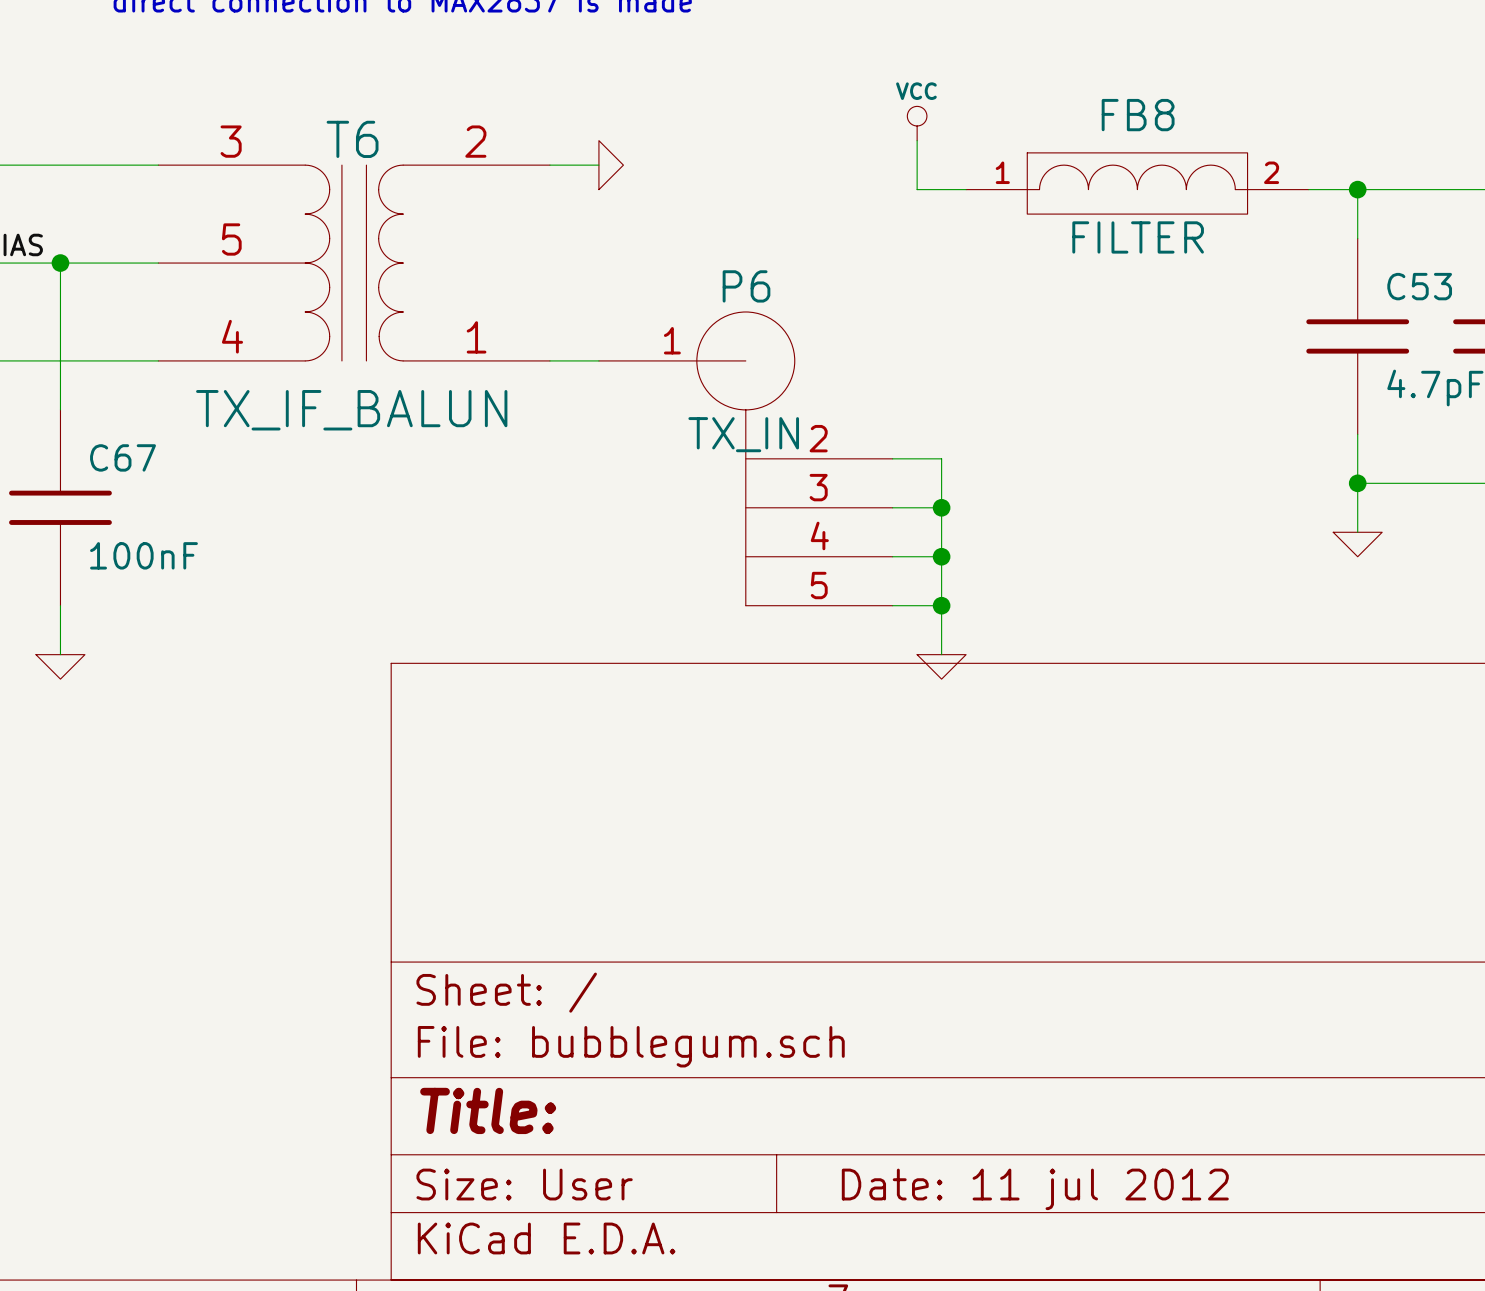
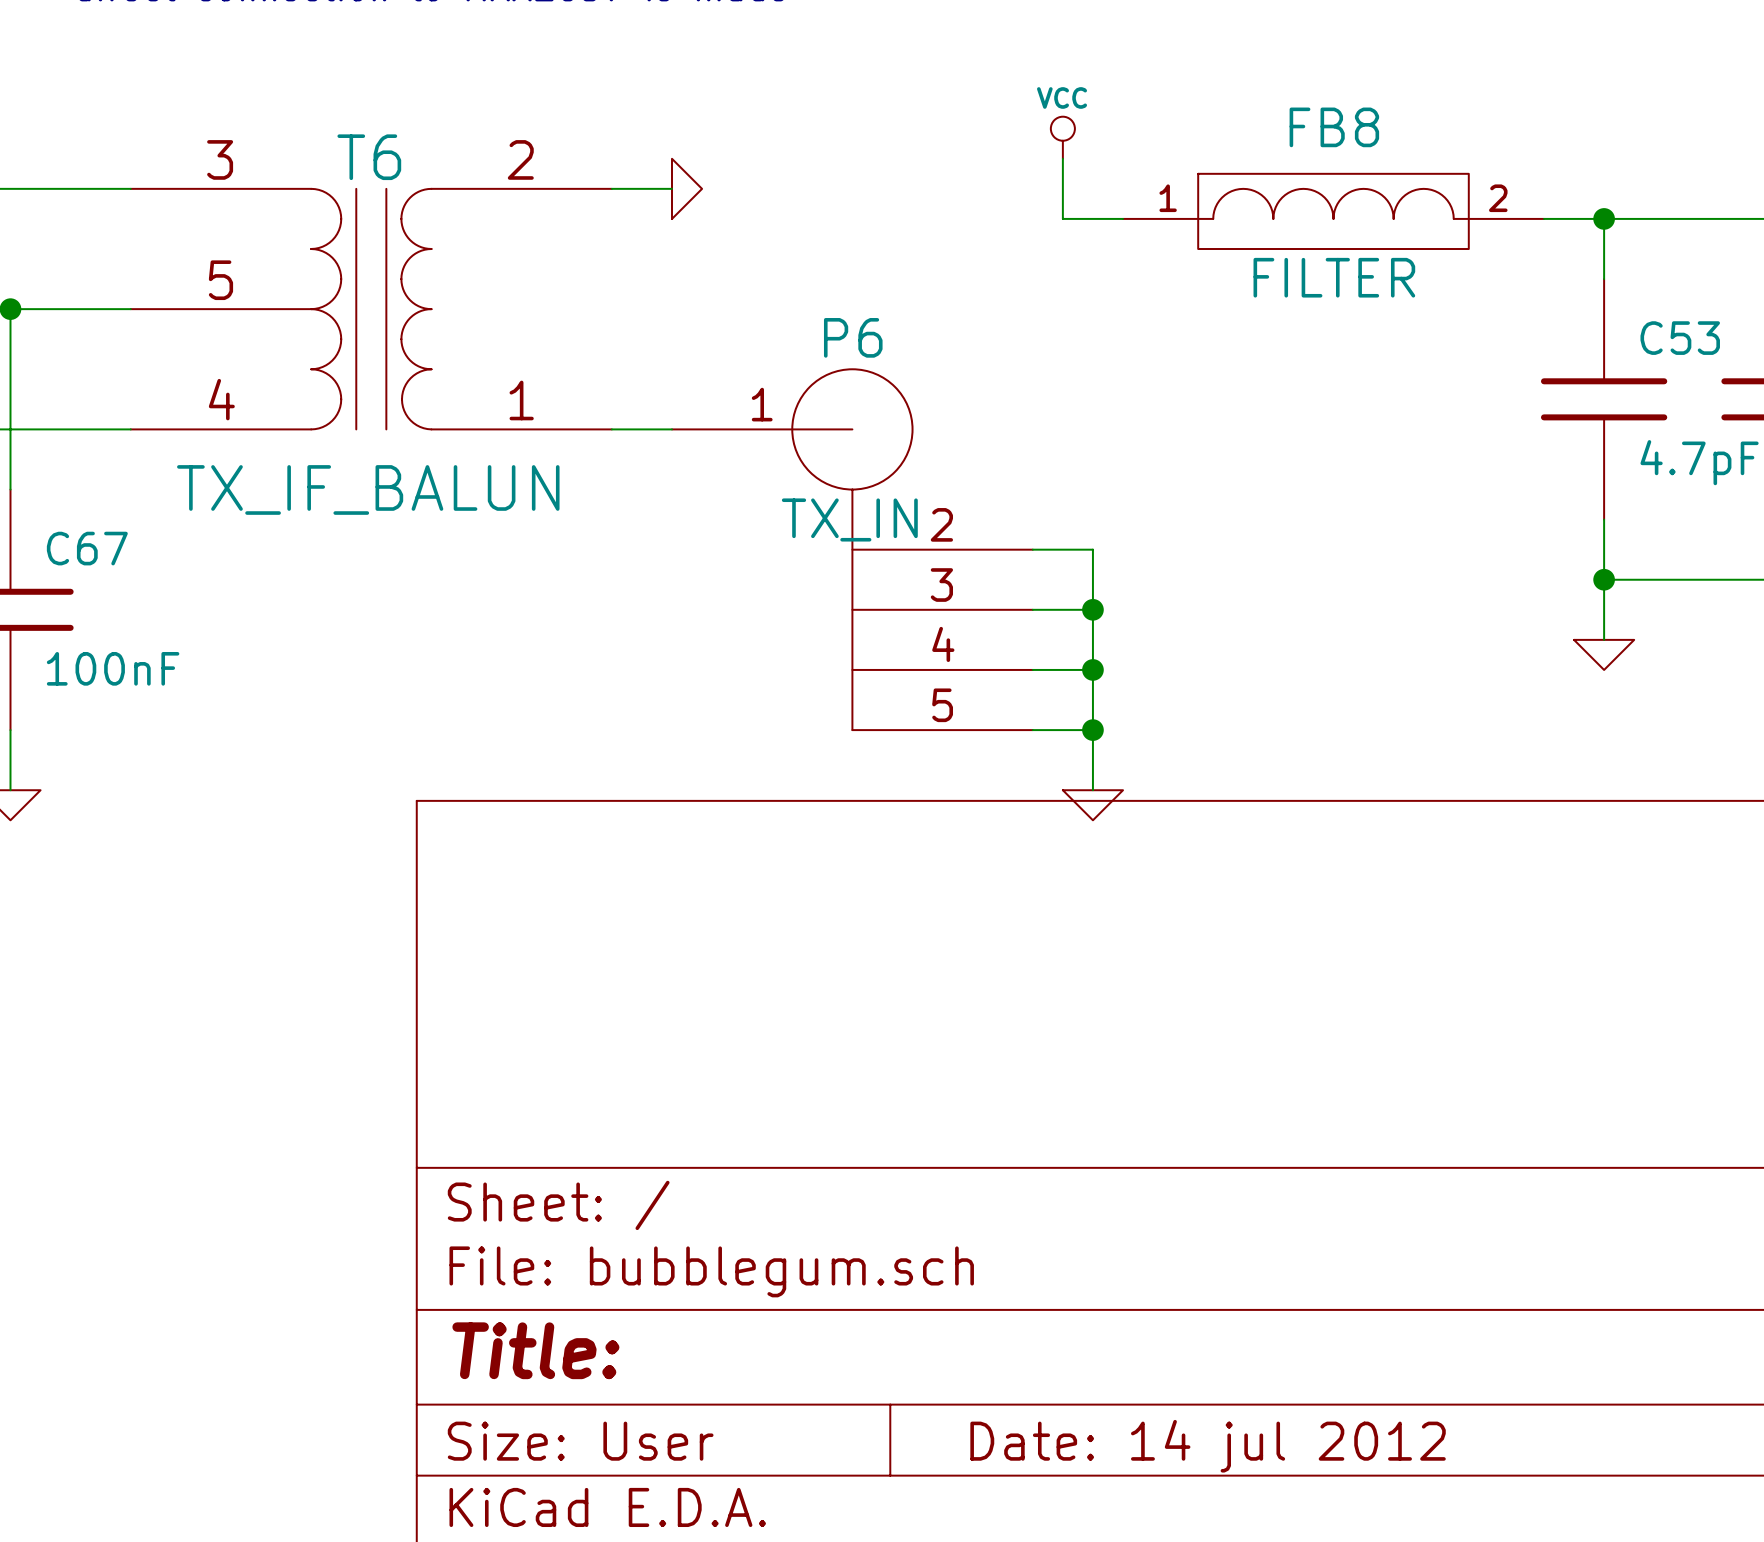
title block: Date: 11 jul 2012 (1035, 1189) -> Date: 14 jul 2012 (1208, 1446)

